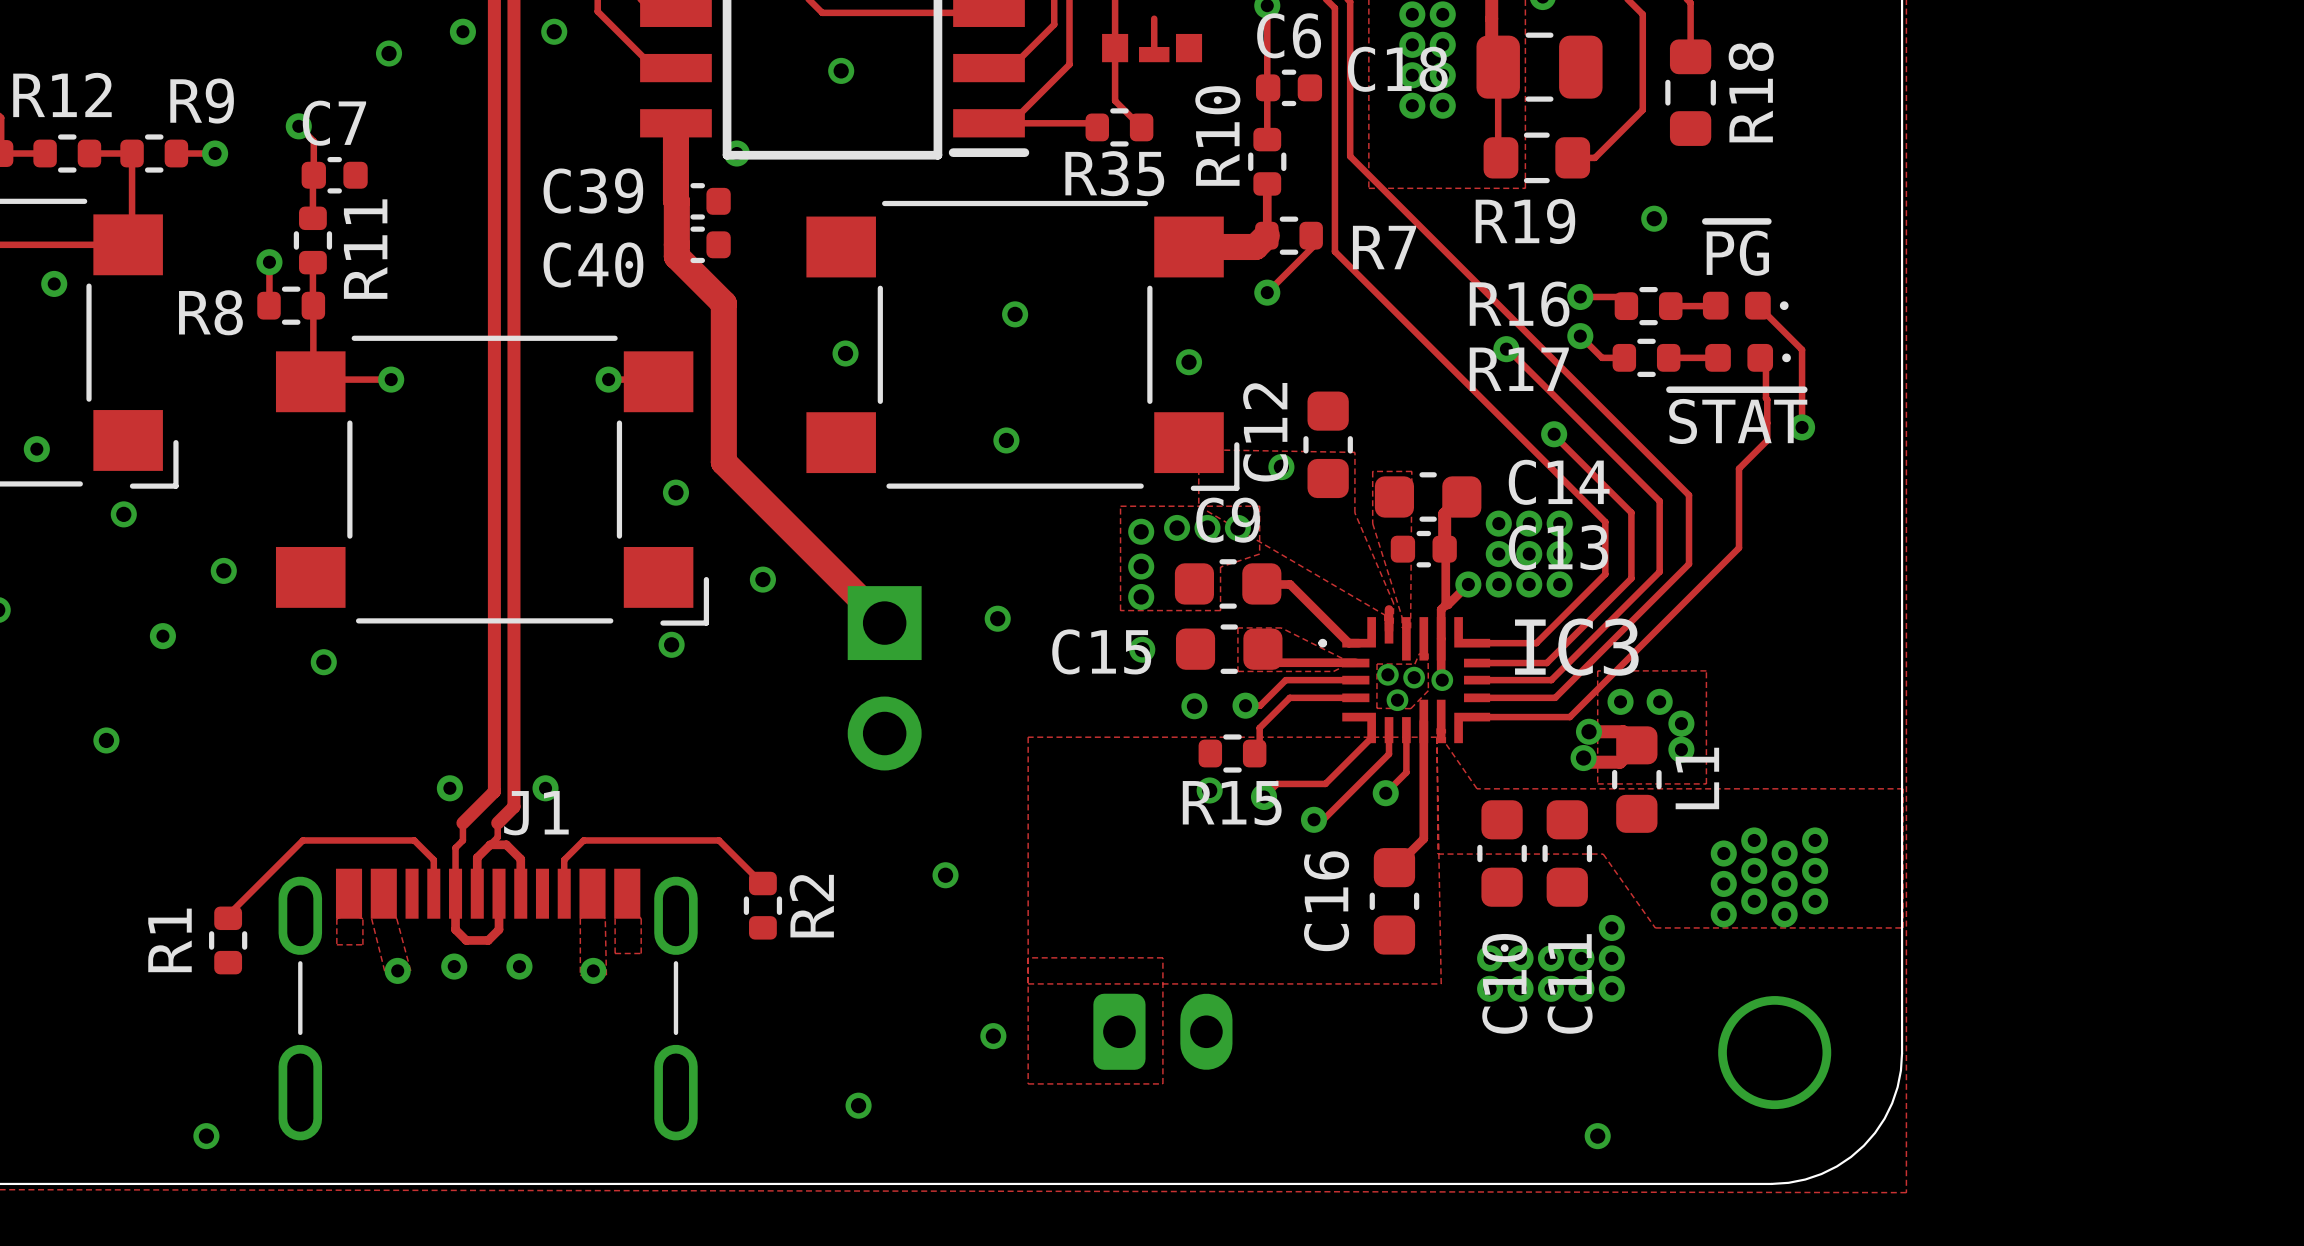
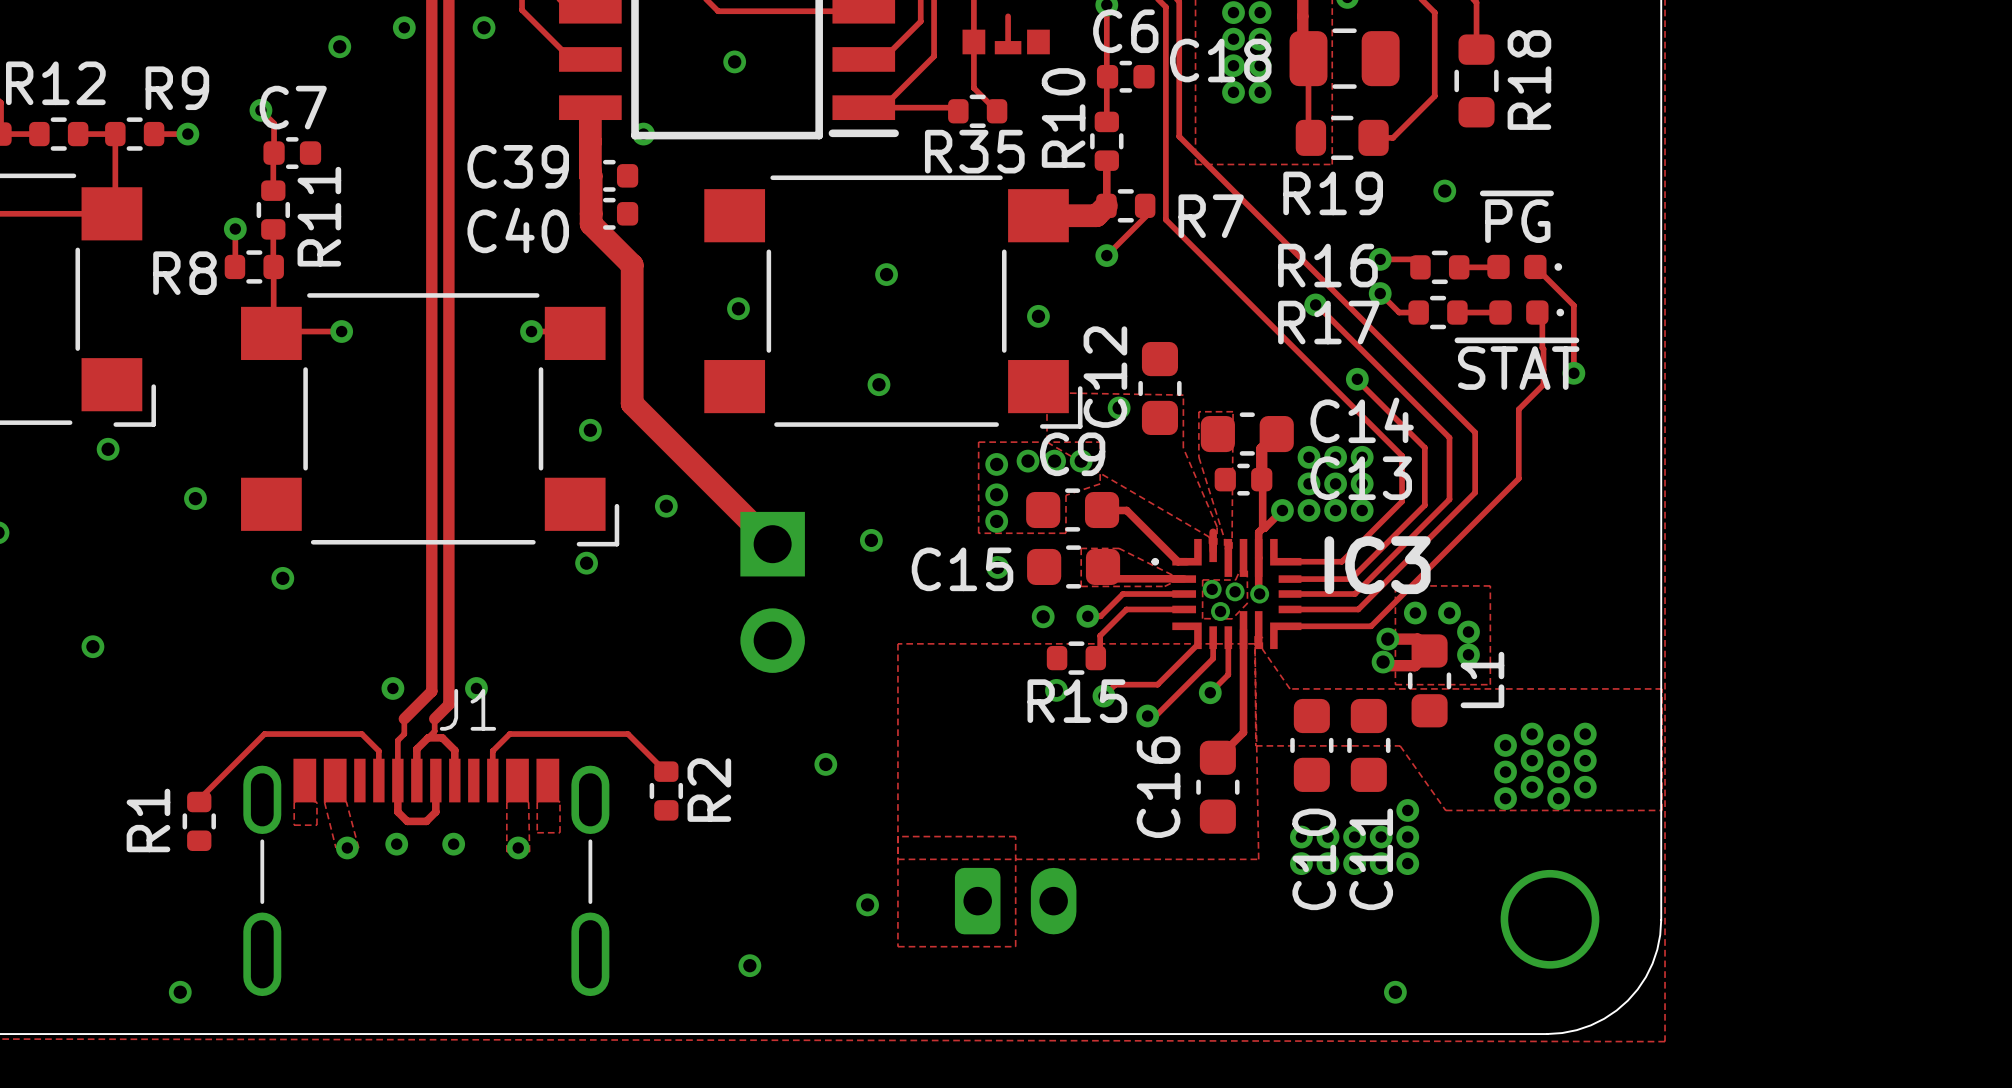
via: (54, 283) -> none
via: (36, 449) -> none
via: (162, 636) -> none

